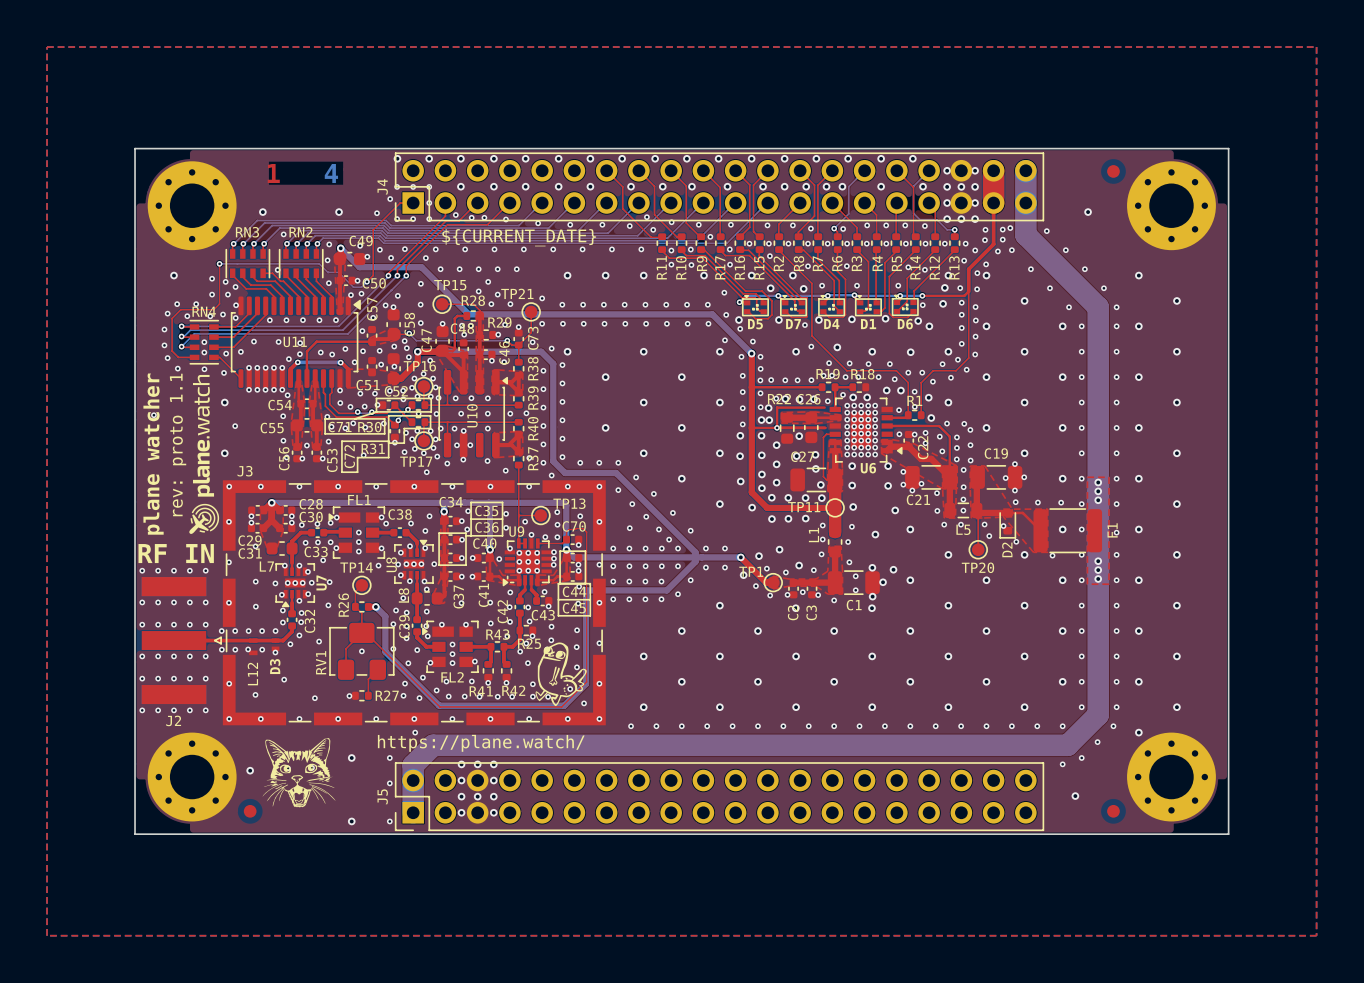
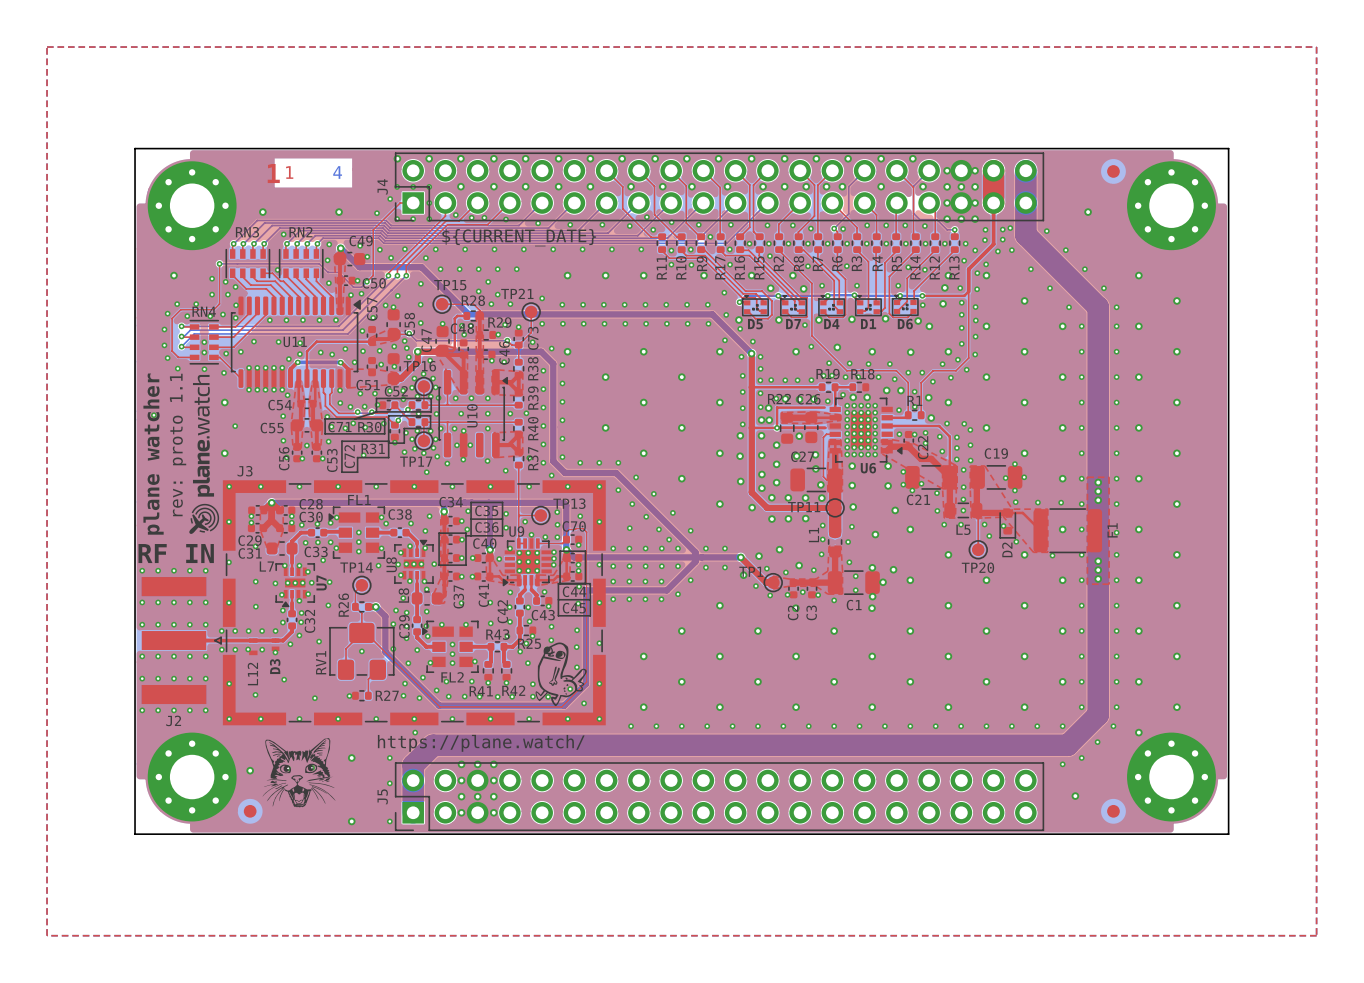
drawing: none -> [286, 166, 343, 179]
text: 4 (331, 173) -> none

